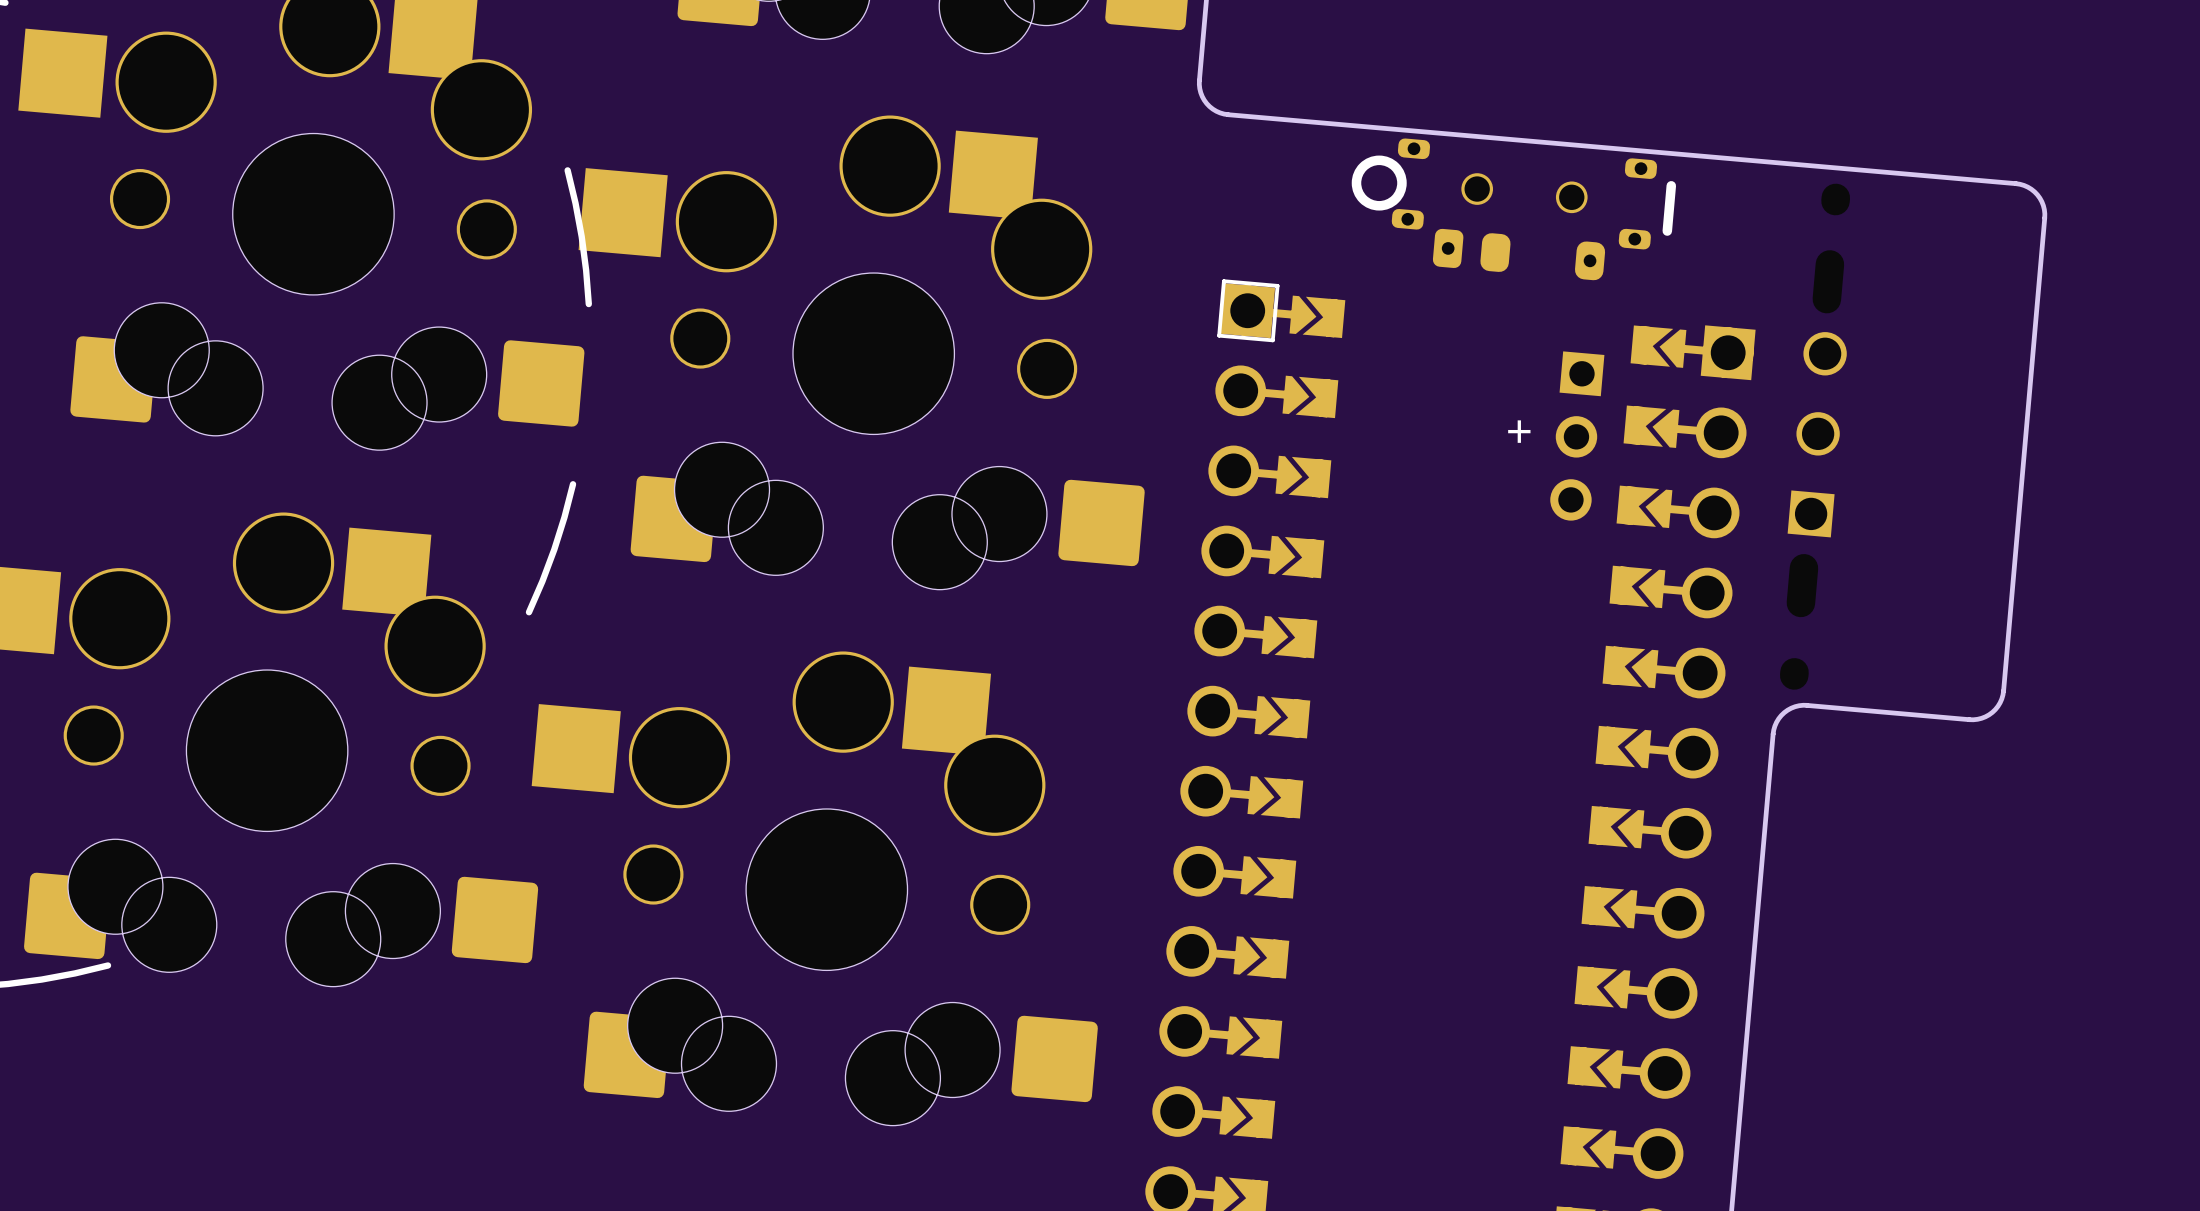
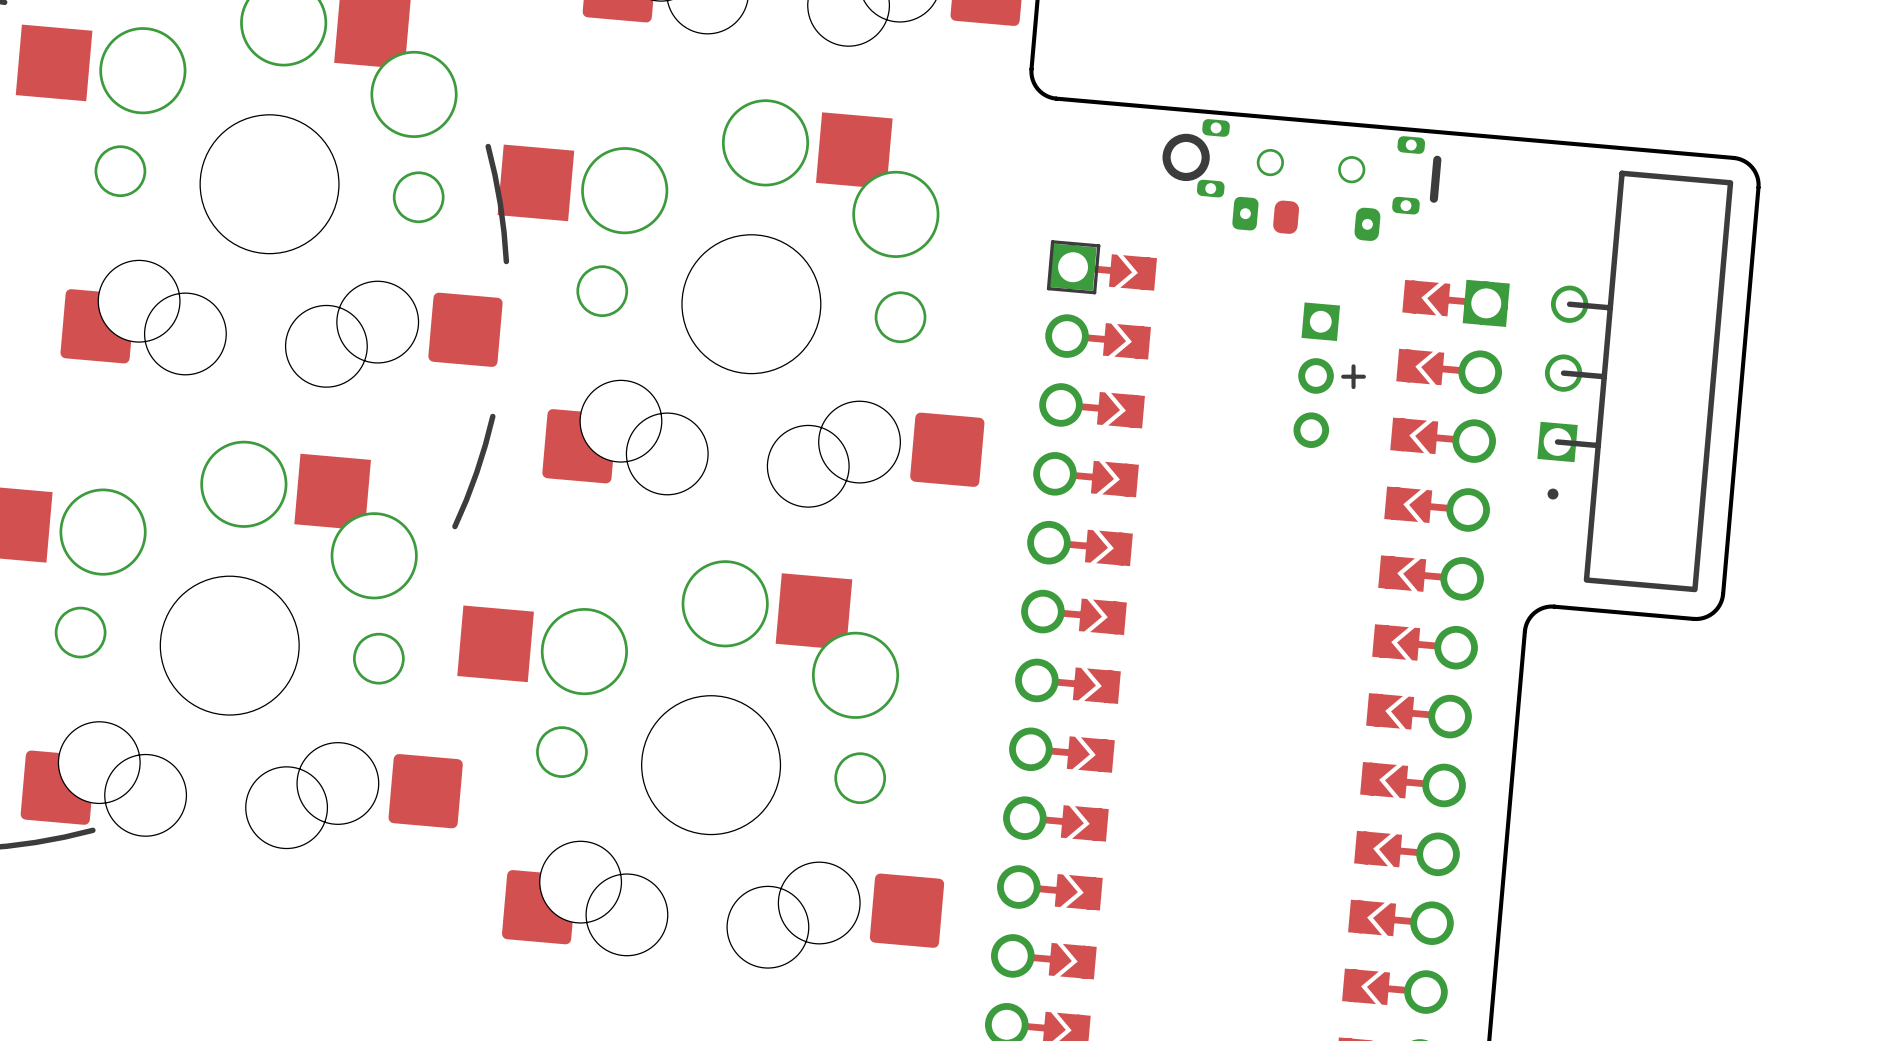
text position: + (1519, 431) -> + (1353, 376)
part: (1817, 434) -> none
part position: (1577, 435) -> (1316, 375)
part: none -> (1635, 381)

